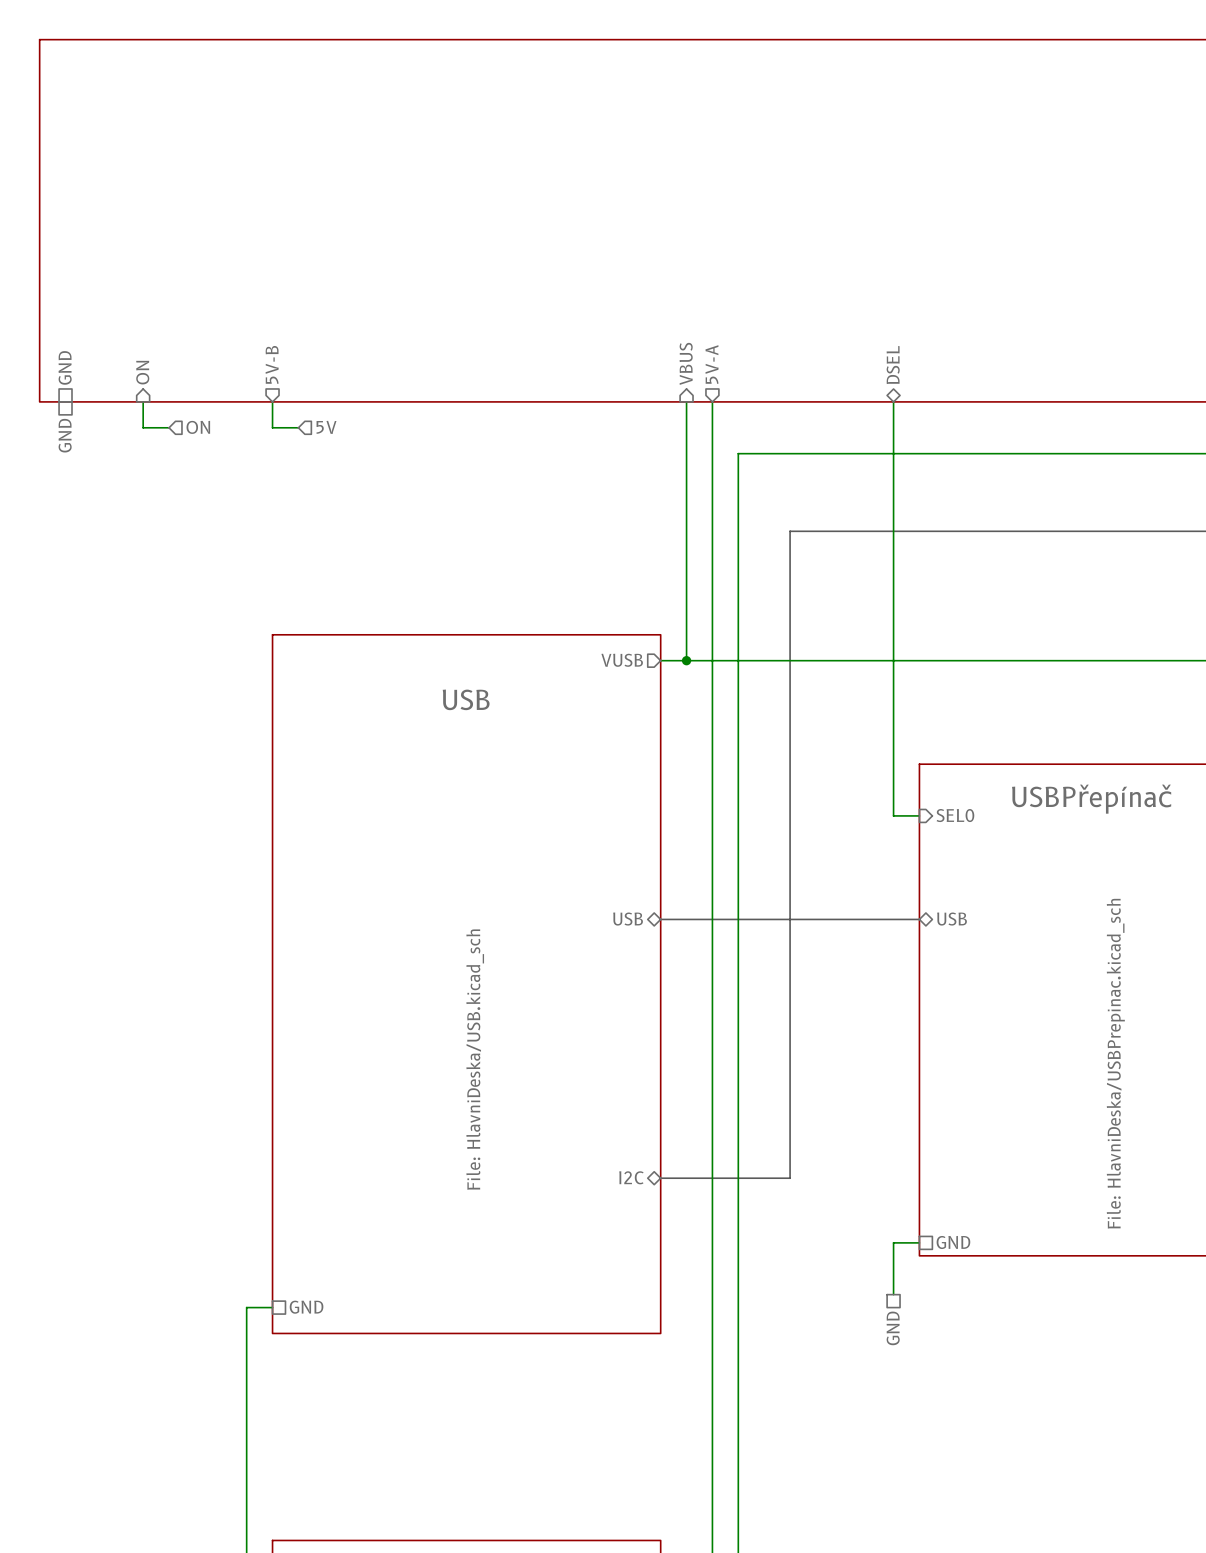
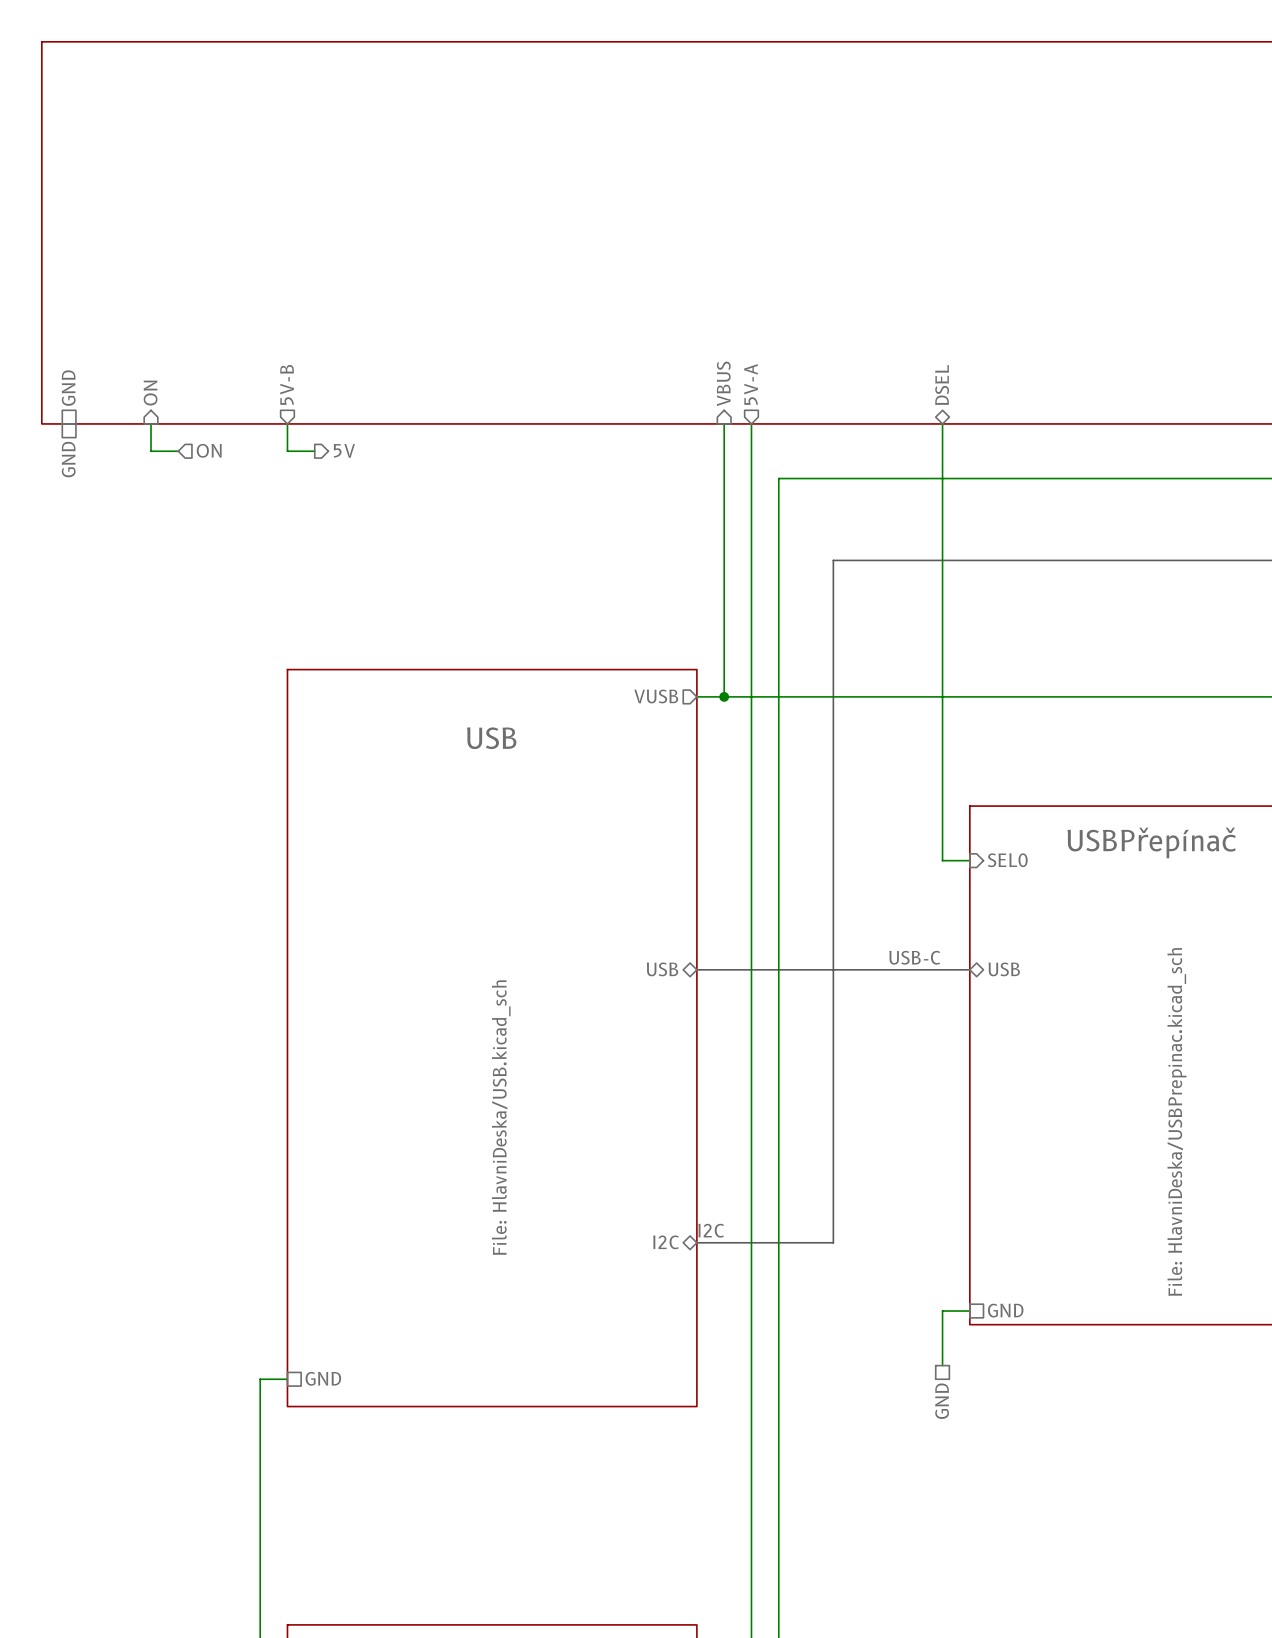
hierarchical label shape: input (326, 427) -> output (344, 450)
label: none -> USB-C (914, 957)
label: none -> I2C (711, 1230)

